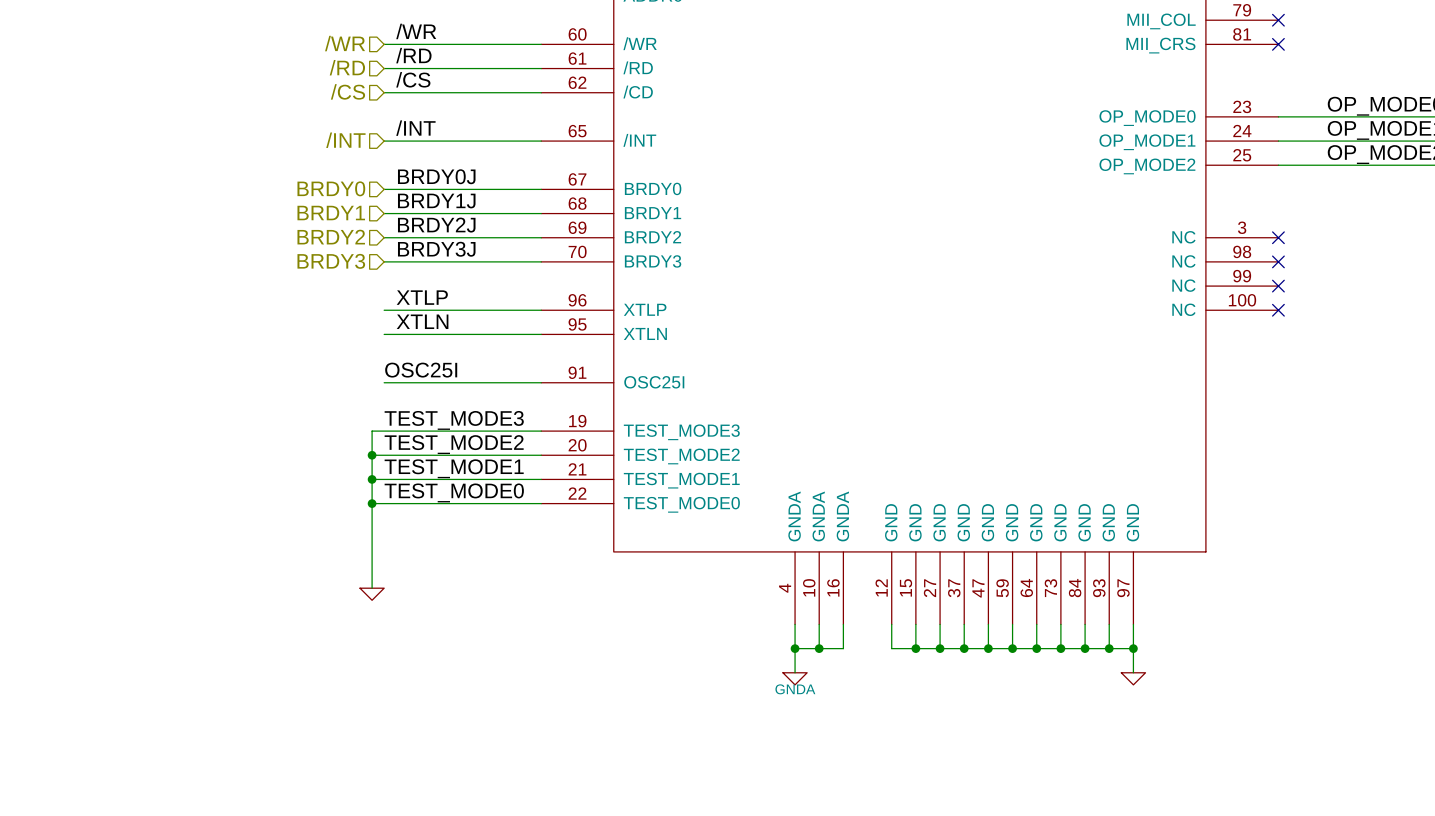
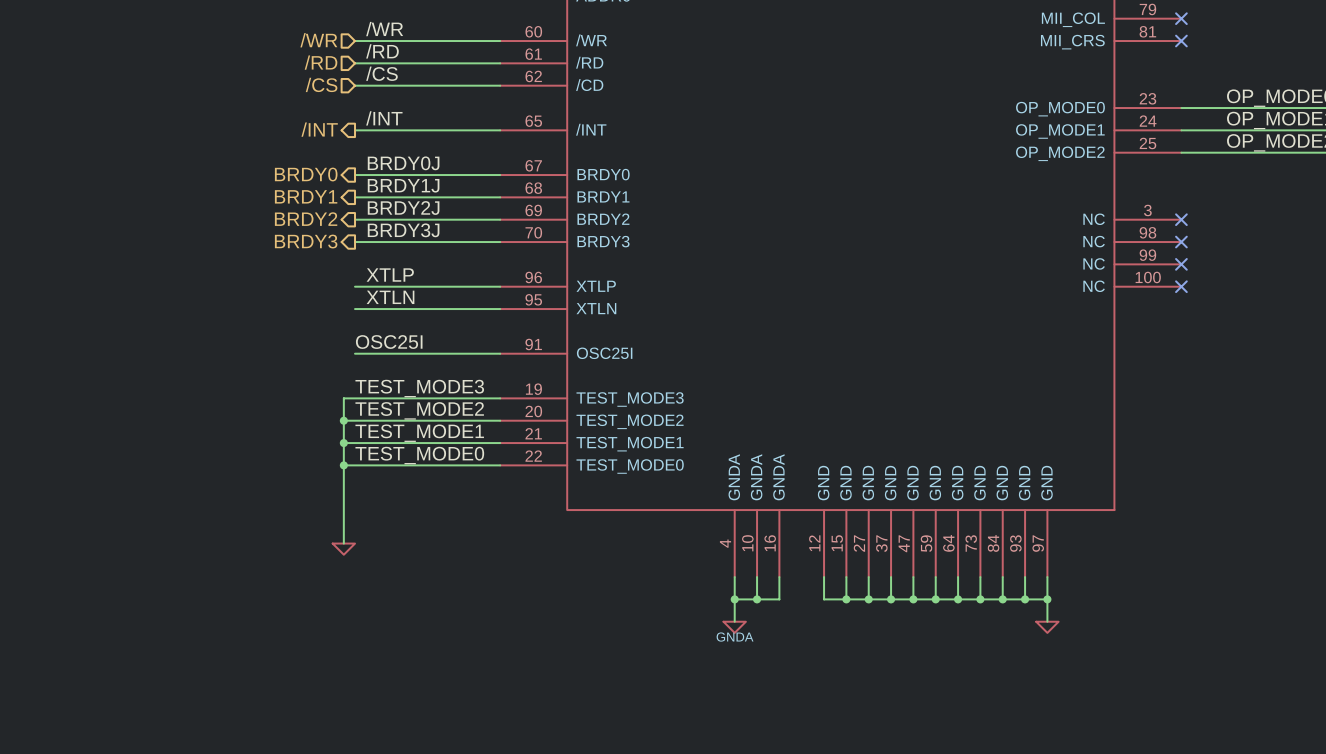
hierarchical label shape: input (345, 140) -> output (319, 129)
hierarchical label shape: input (331, 188) -> output (306, 174)
hierarchical label shape: input (331, 213) -> output (306, 196)
hierarchical label shape: input (331, 237) -> output (306, 219)
hierarchical label shape: input (331, 261) -> output (306, 241)

